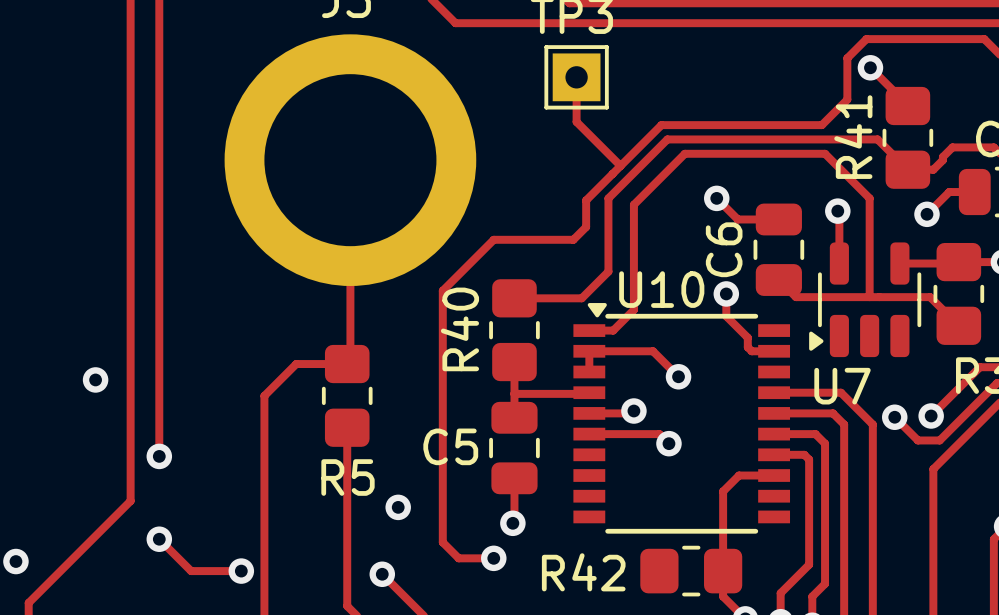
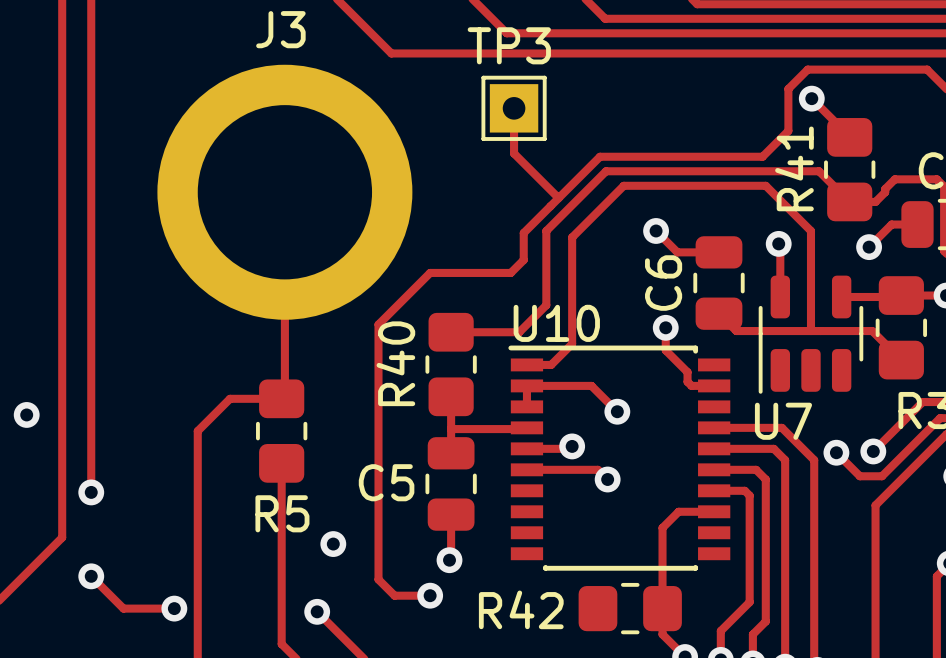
U7 footprint: [809, 242, 922, 358] -> [758, 275, 864, 394]
U10 name position: U10 (661, 289) -> U10 (556, 323)
U10 footprint: [573, 303, 791, 534] -> [508, 345, 731, 571]

